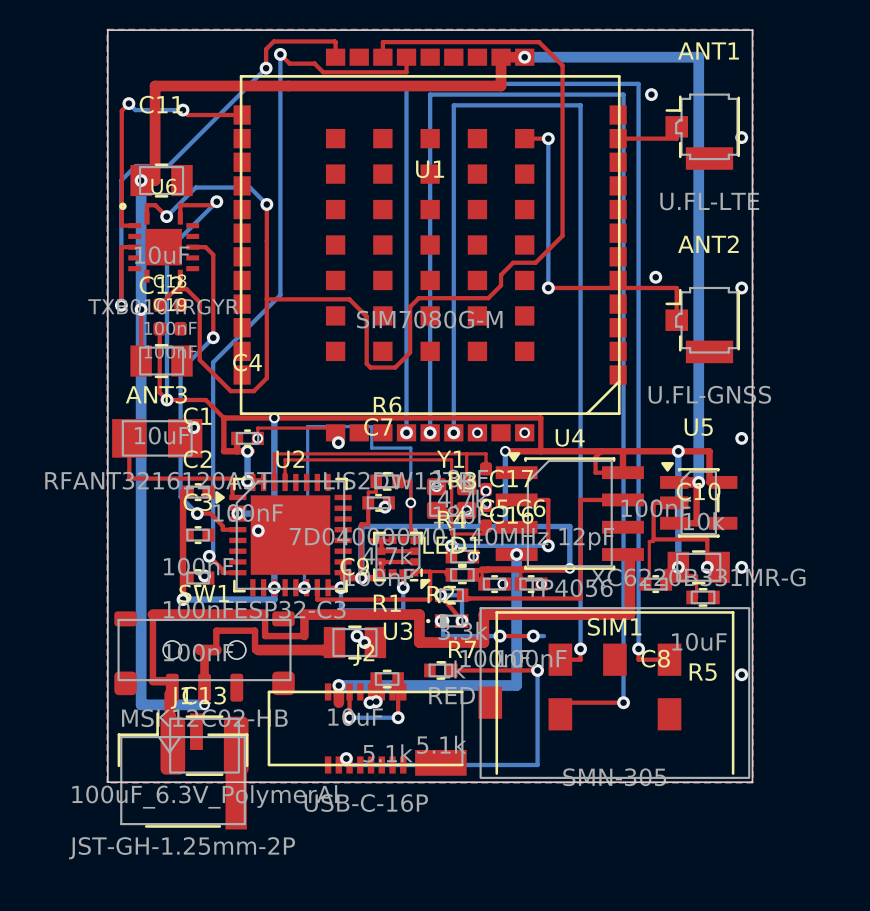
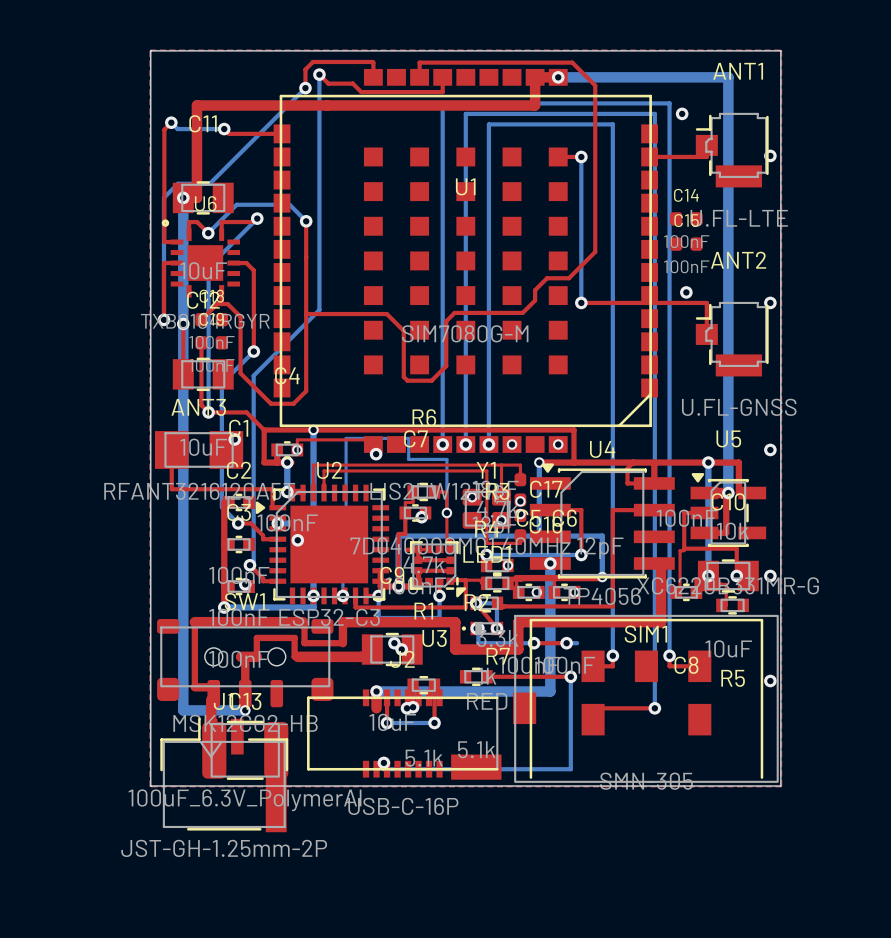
C14: none -> 100nF (686, 218)
C15: none -> 100nF (686, 244)

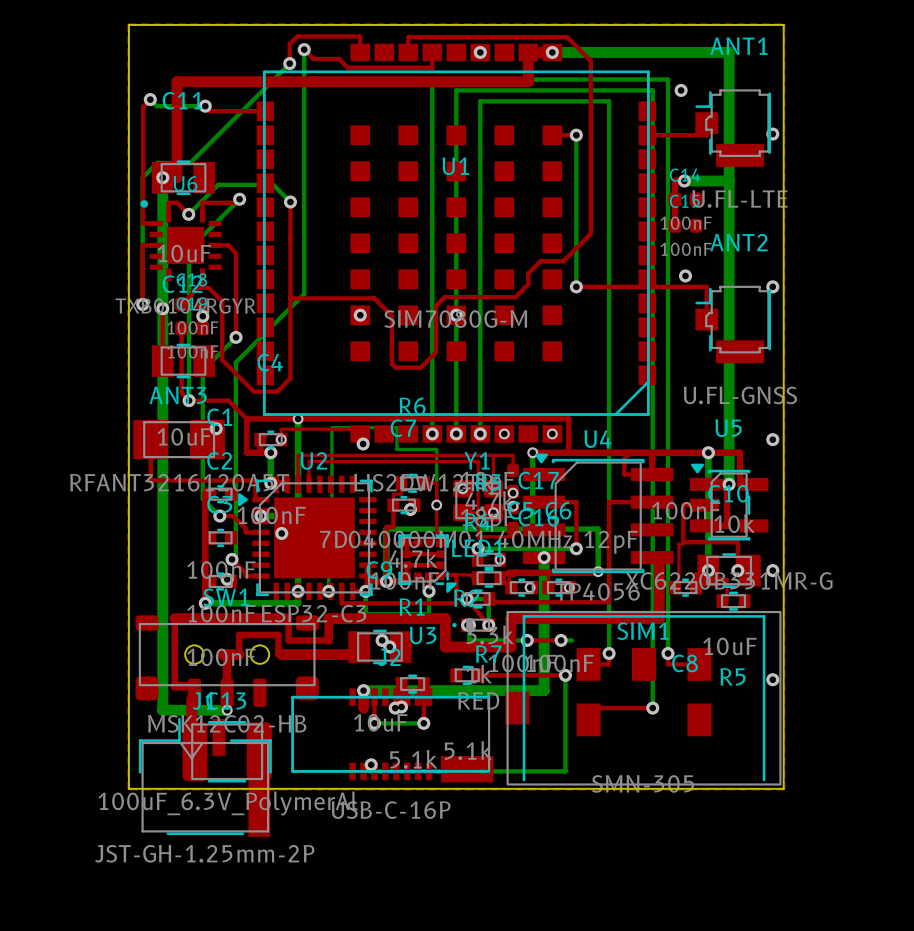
via: none -> (480, 52)
top track: none -> (684, 181) (674, 181) (674, 225)
bottom track: none -> (684, 181) (729, 181)
via: none -> (684, 181)
via: none -> (360, 315)
via: none -> (456, 315)
via: none -> (202, 316)

